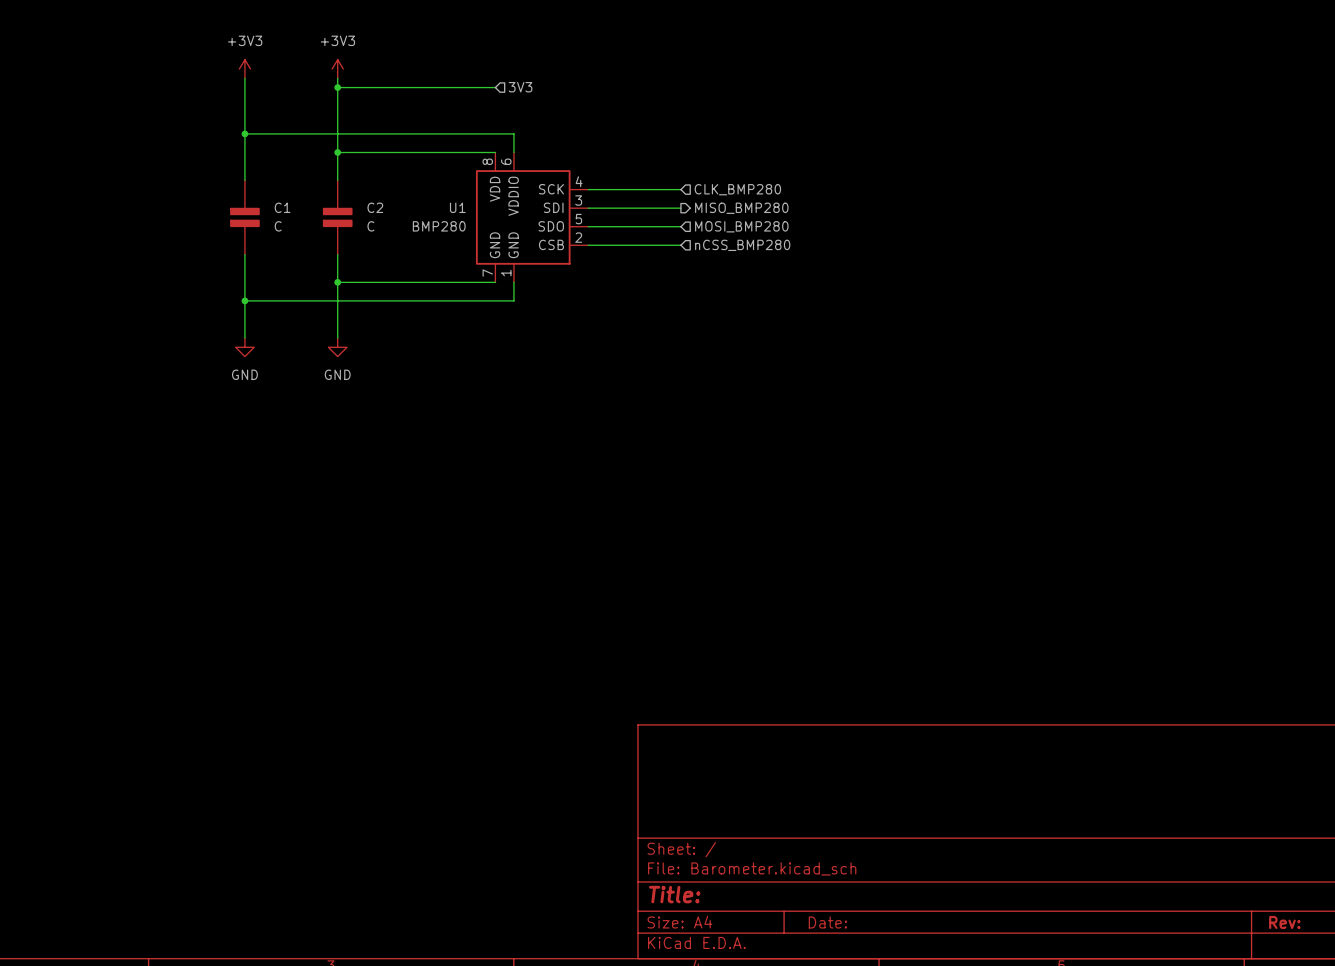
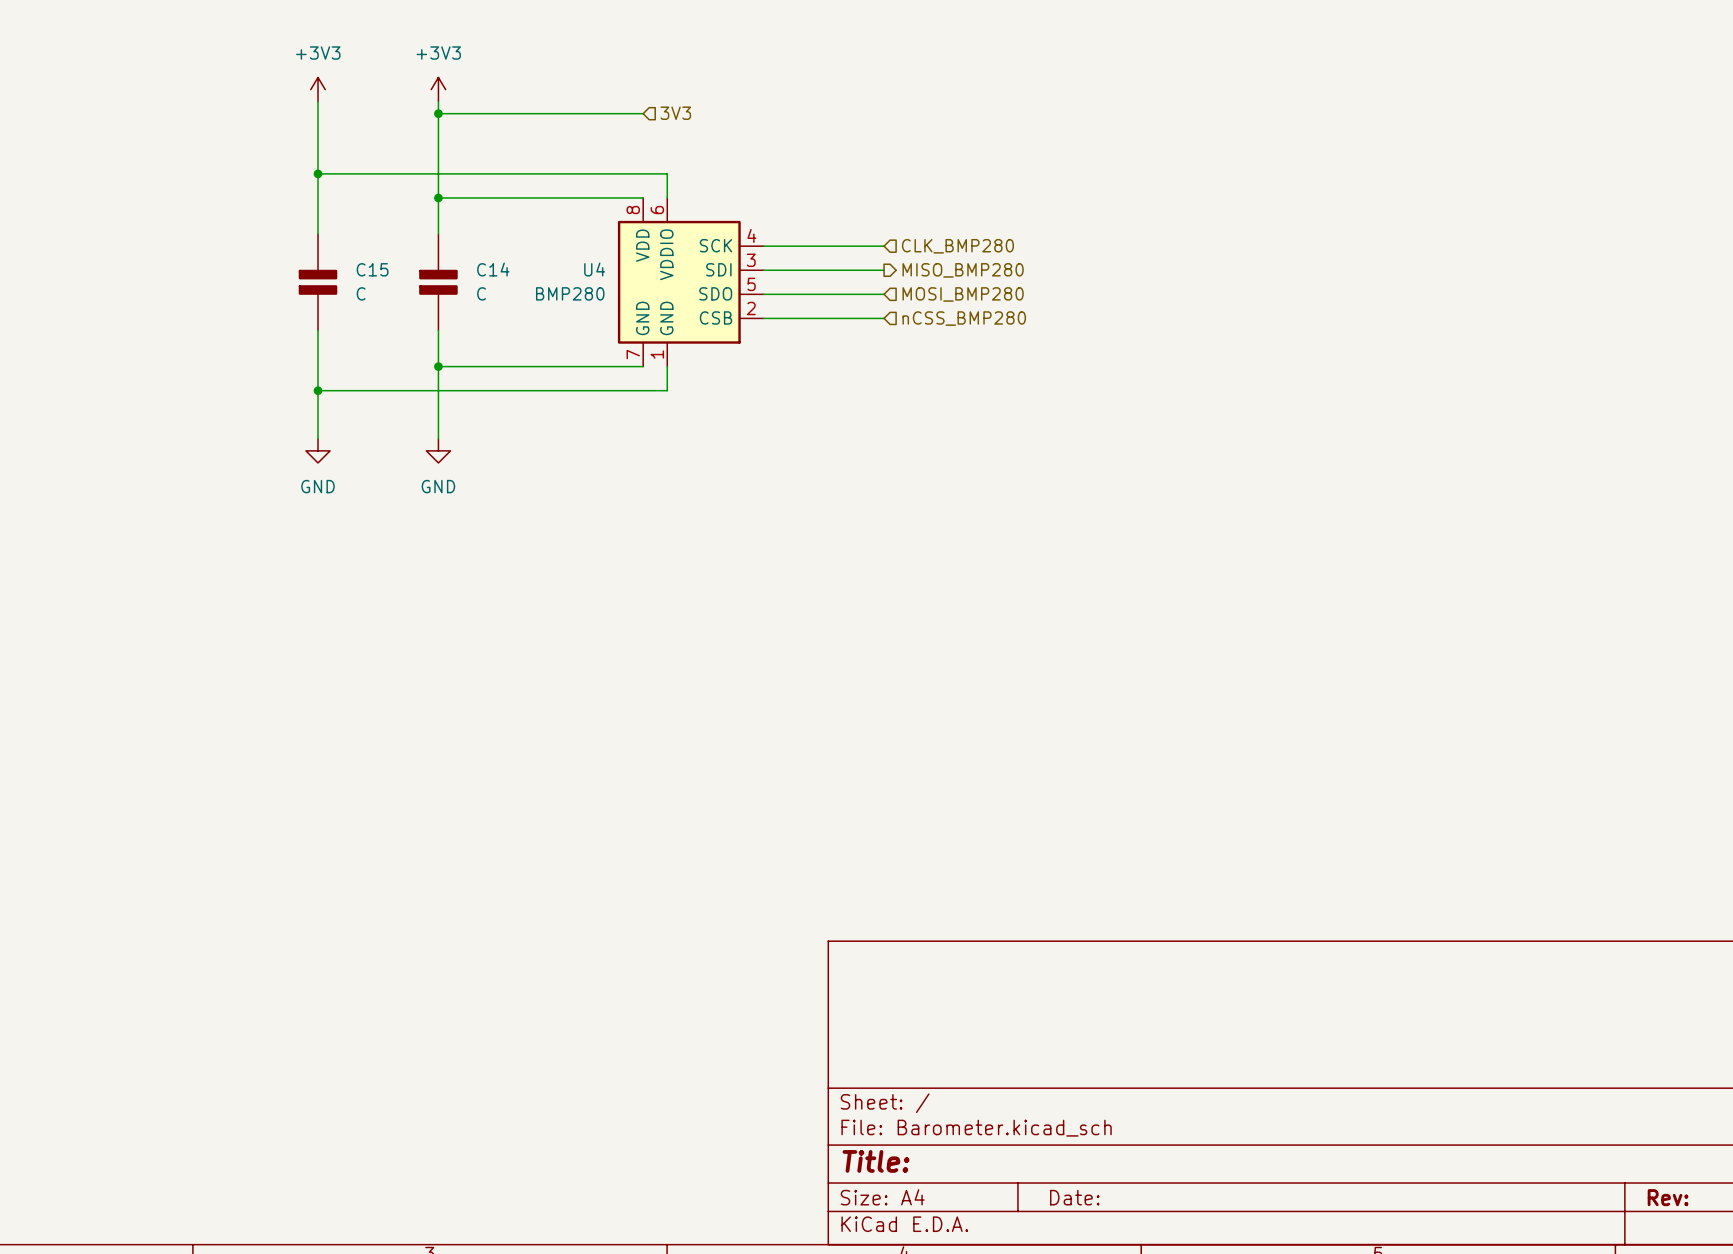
C1 name: C1 (282, 207) -> C15 (372, 269)
C2 name: C2 (375, 207) -> C14 (493, 269)
U1 name: U1 (457, 207) -> U4 (594, 269)

